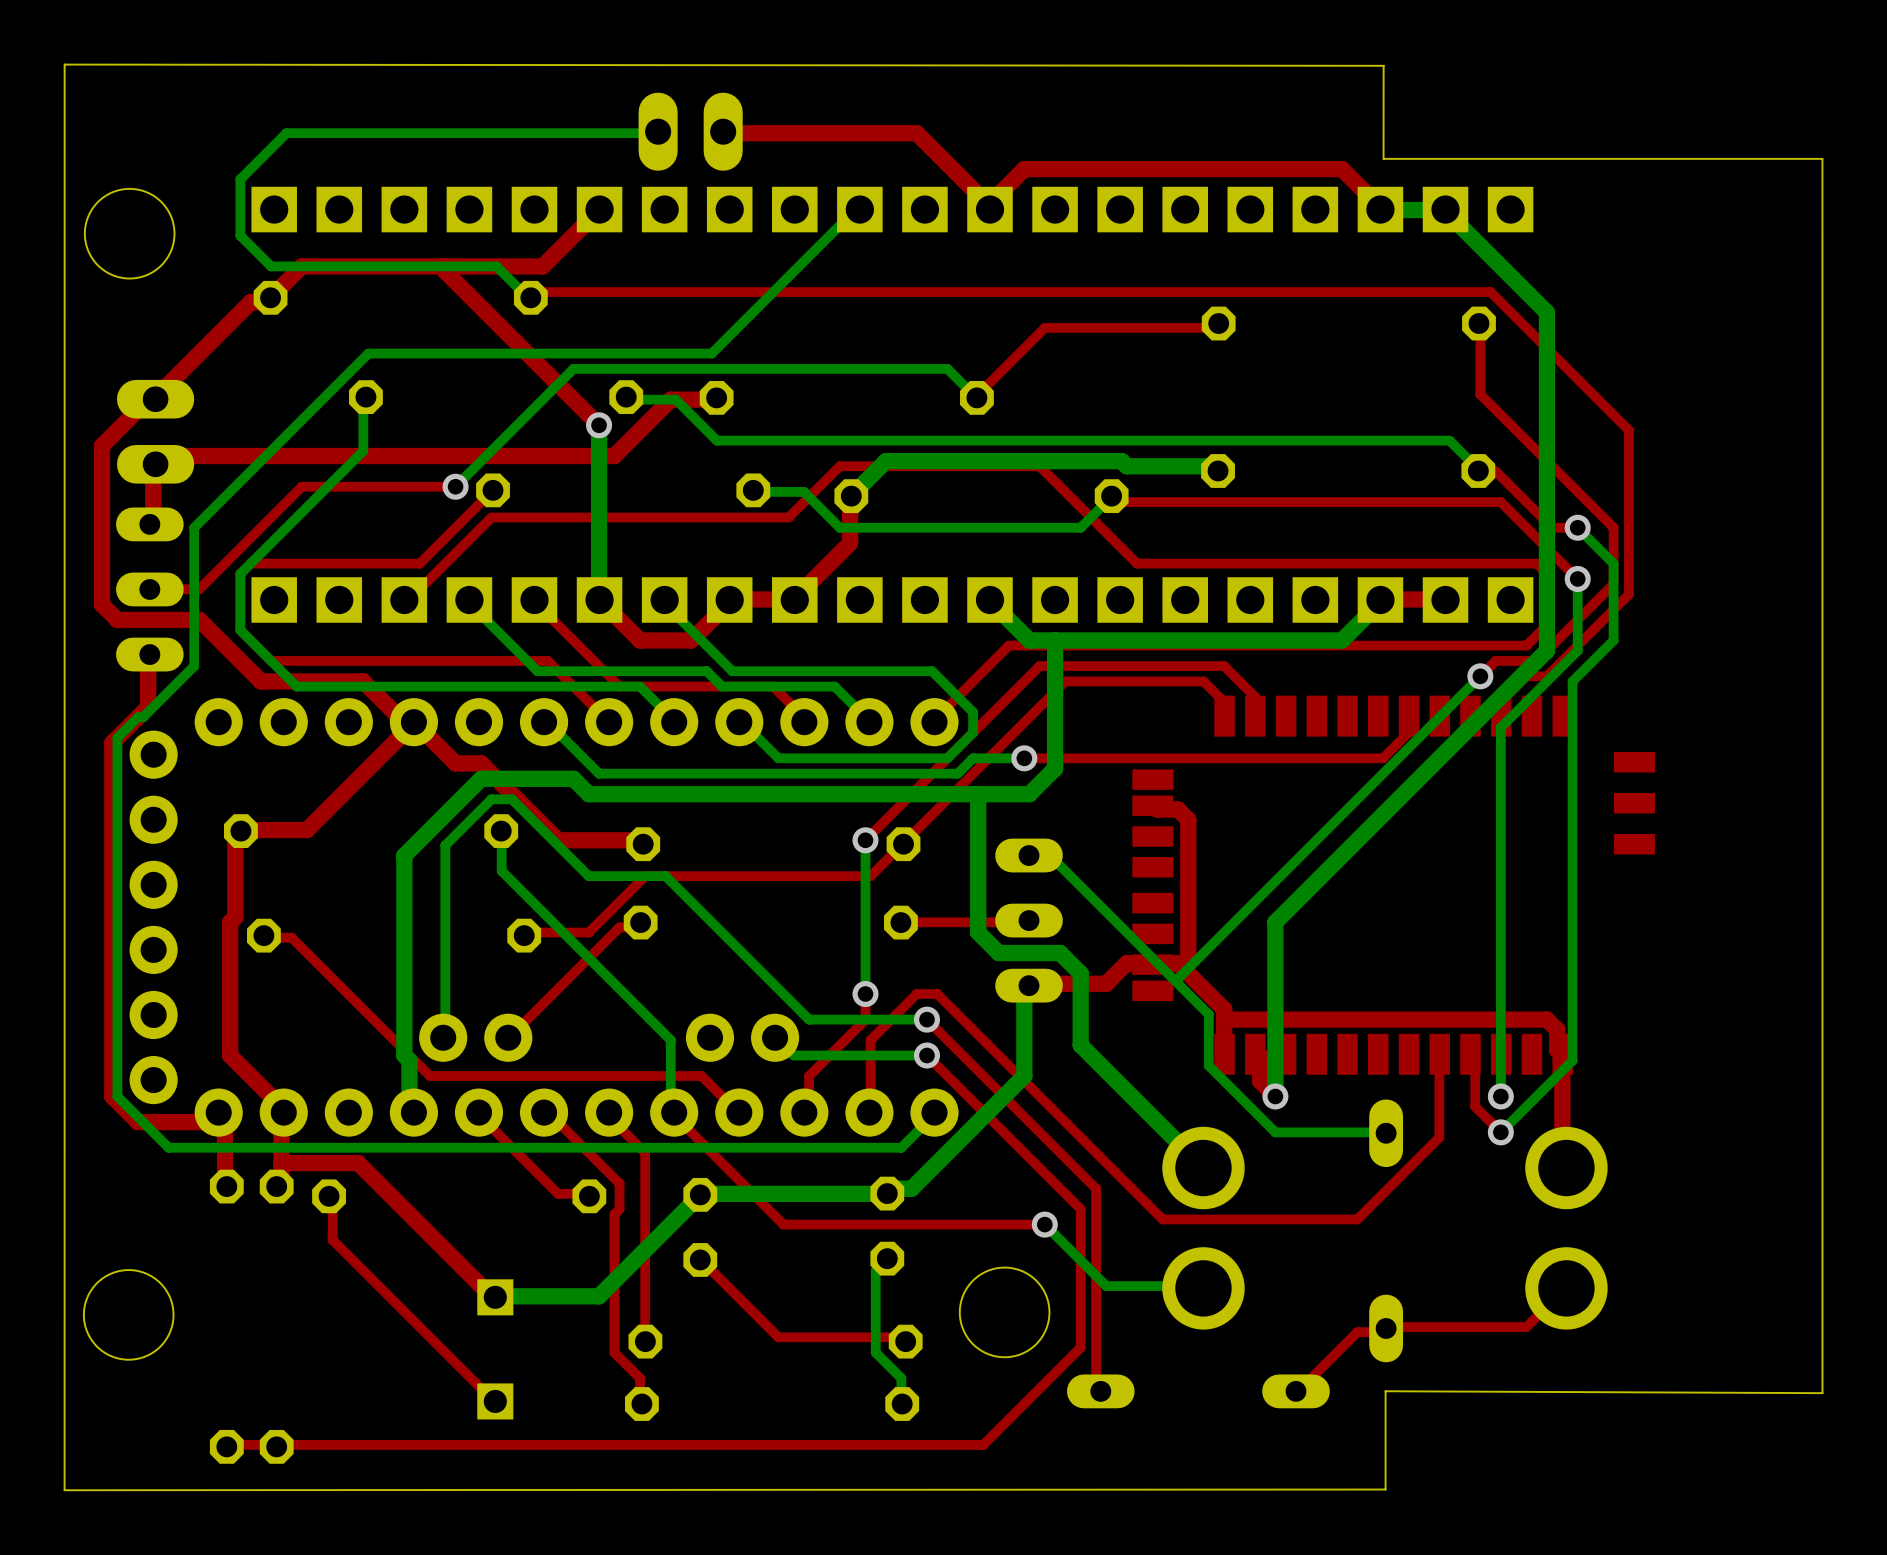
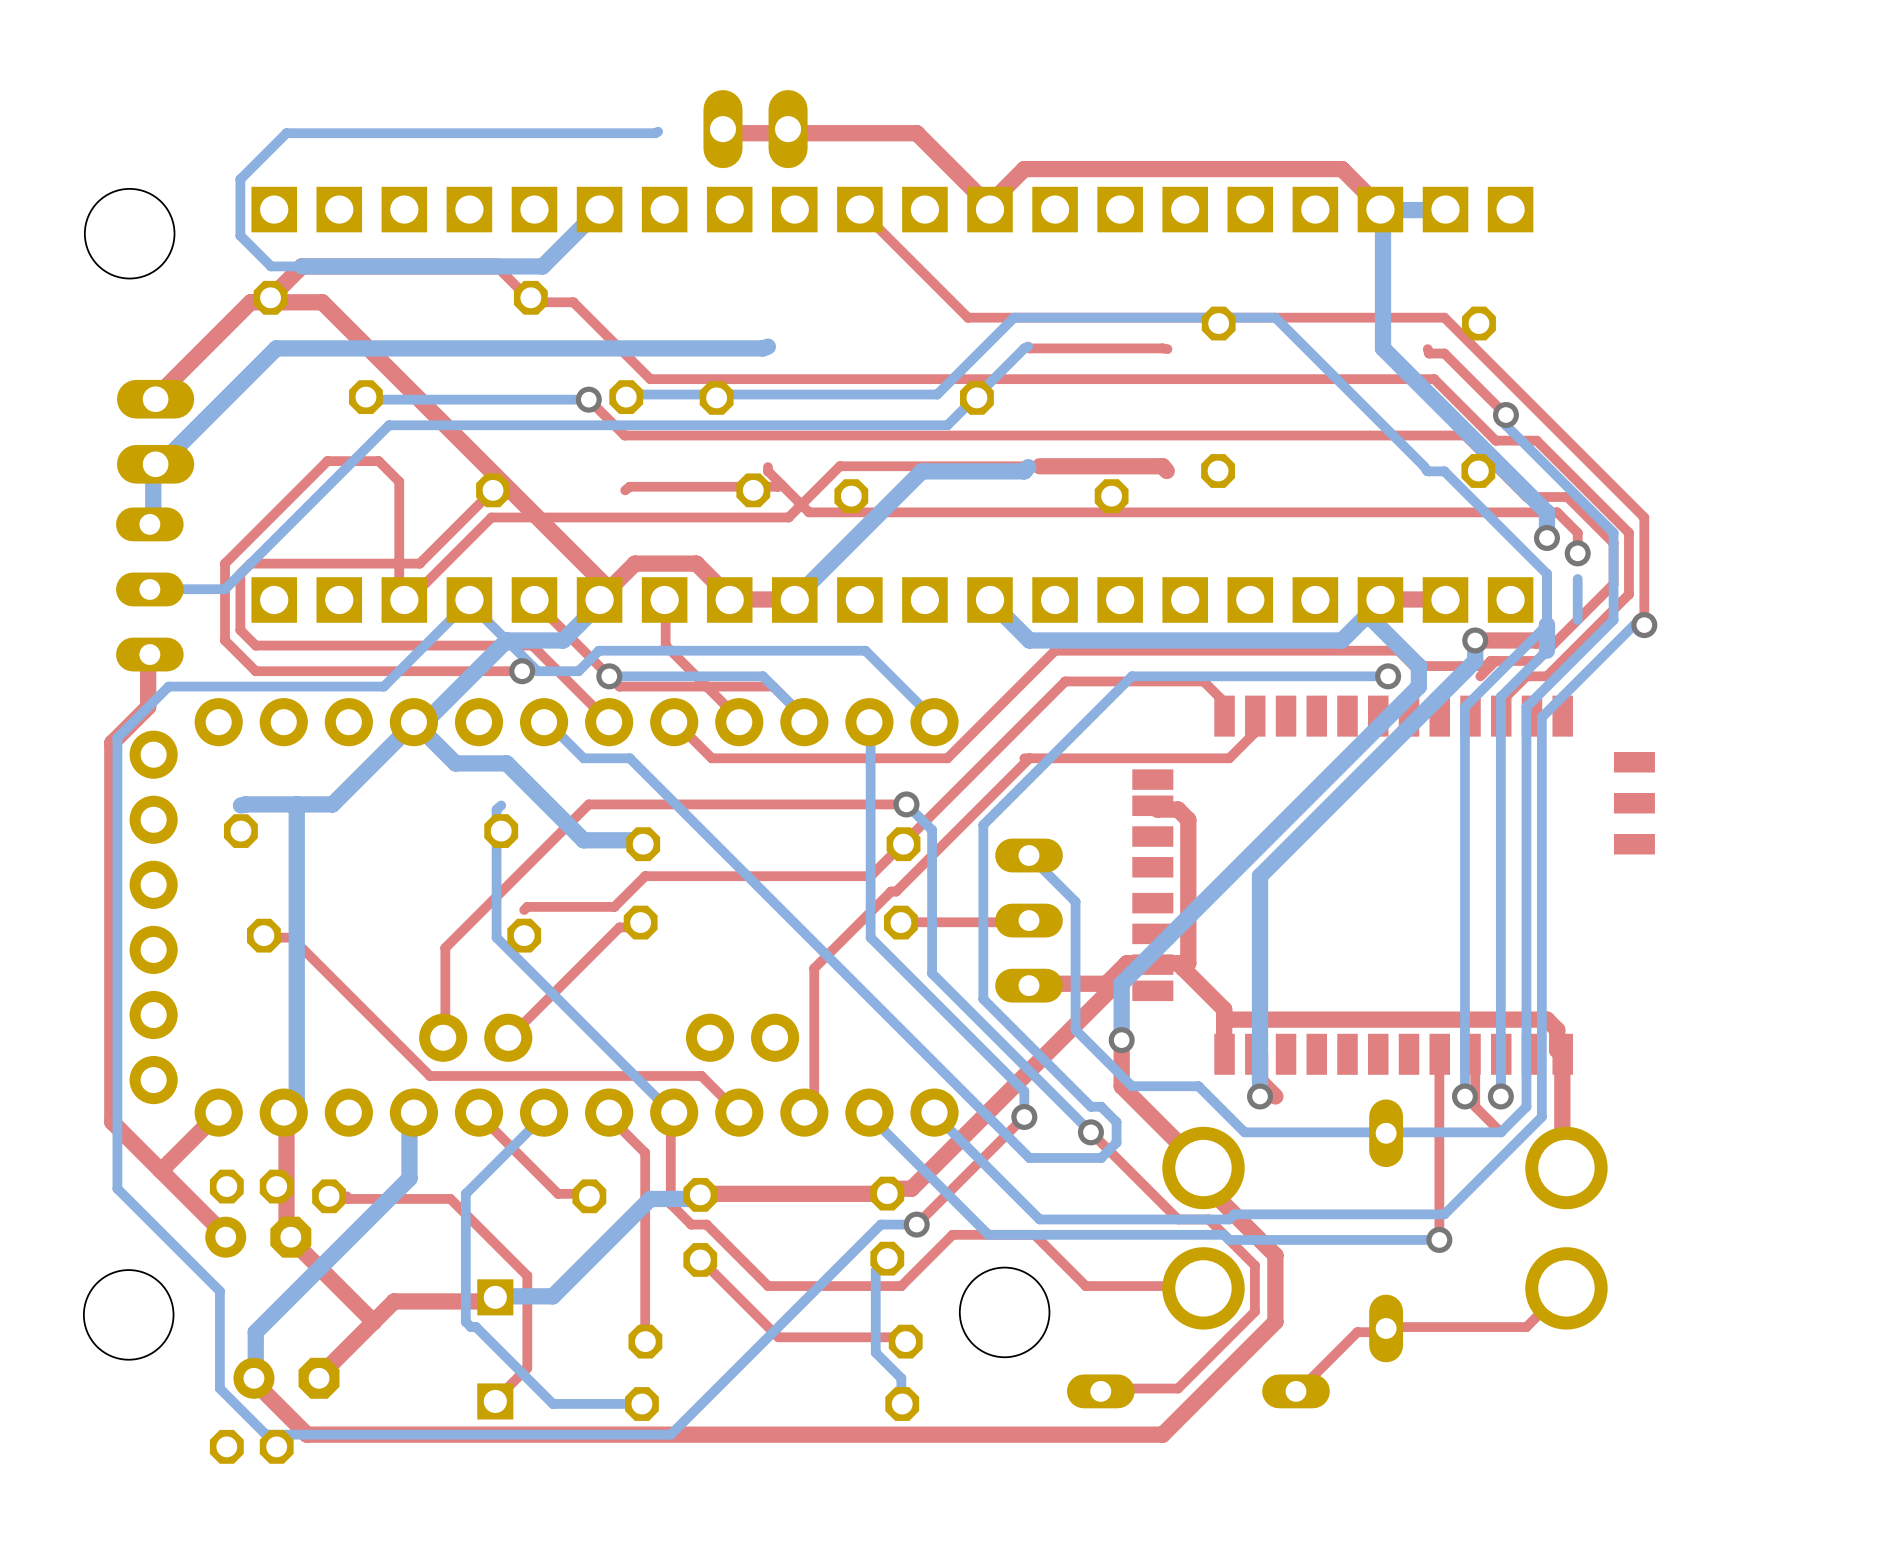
board edge: (64, 64) (64, 1490) (1385, 1489) (1385, 1391) (1822, 1393) (1822, 158) (1383, 158) (1383, 65) (64, 64) -> none
part position: (690, 131) -> (755, 129)
top track: (599, 209) (542, 266) (496, 266) -> none
top track: none -> (859, 209) (967, 317) (1444, 317) (1644, 517) (1644, 625)
bottom track: (859, 209) (855, 210) (711, 353) (368, 353) (194, 527) (194, 666) (143, 717) (137, 717) -> (296, 686) (168, 686) (137, 717)
bottom track: (1444, 210) (1546, 312) (1546, 512) -> (1383, 210) (1383, 348) (1546, 512)
top track: (445, 266) (445, 271) (599, 425) -> none
bottom track: (496, 266) (527, 297) (530, 297) -> (496, 266) (542, 266) (599, 209)
bottom track width: thin (496, 266) (301, 266) -> thick (496, 266) (301, 266)
top track: (530, 297) (537, 292) (1490, 292) (1628, 430) (1628, 532) -> (496, 266) (527, 297) (530, 297) (532, 302) (573, 302) (650, 379) (1434, 379) (1495, 440) (1536, 440) (1628, 532)
top track: (1218, 323) (1213, 327) (1044, 327) (976, 397) -> none
top track: (1478, 323) (1480, 394) (1613, 527) (1613, 543) -> (588, 399) (624, 435) (1464, 435) (1526, 497) (1567, 497) (1613, 543)
bottom track: none -> (767, 346) (763, 348) (276, 348) (158, 466) (155, 464) (153, 471) (153, 522) (149, 524)
top track: none -> (1028, 346) (1029, 348) (1167, 349)
bottom track: none -> (1028, 346) (947, 425) (388, 425) (363, 450)
top track: none -> (1427, 349) (1429, 353) (1444, 353) (1505, 415)
bottom track: (365, 397) (363, 399) (363, 450) -> (365, 397) (368, 399) (588, 399)
bottom track: (626, 397) (629, 399) (675, 399) (716, 440) (1449, 440) (1478, 470) -> (626, 397) (629, 394) (937, 394) (1014, 317) (1275, 317) (1427, 470) (1444, 471) (1546, 573)
top track: (716, 397) (711, 399) (670, 399) (614, 456) (163, 456) (155, 464) (153, 471) (153, 522) (149, 524) -> none
bottom track: (976, 397) (947, 368) (573, 368) (455, 486) -> none
top track: (155, 399) (148, 399) (102, 445) (102, 604) (117, 619) (199, 619) (260, 681) (363, 681) (404, 722) (413, 722) -> none
via: none -> (1505, 415)
bottom track: (599, 425) (599, 599) -> (413, 722) (424, 722) (506, 640) (563, 640) (599, 604) (599, 599)
via position: (599, 425) -> (588, 399)
top track: (1039, 466) (1137, 563) (1536, 563) (1546, 573) -> (1039, 466) (1162, 466) (1166, 470)
top track: none -> (767, 467) (768, 471) (809, 512) (1557, 512) (1577, 532) (1577, 553)
bottom track: none -> (1028, 467) (1024, 471) (921, 471) (794, 599)
bottom track: (1218, 470) (1213, 466) (1126, 466) (1121, 461) (885, 461) (851, 496) -> none
top track: (1478, 470) (1495, 471) (1552, 527) (1577, 527) -> none
top track: none -> (780, 484) (778, 486) (629, 486) (625, 490)
top track: (455, 486) (301, 486) -> (404, 599) (399, 599) (399, 481) (378, 461) (327, 461) (301, 486)
via: (455, 486) -> none
bottom track: (753, 490) (804, 491) (839, 527) (1080, 527) (1111, 496) -> none
top track: (851, 496) (850, 543) (793, 599) -> none
top track: (1111, 496) (1116, 497) (1121, 502) (1500, 502) (1577, 578) -> none
bottom track: (1577, 527) (1613, 563) -> (1505, 415) (1505, 425) (1613, 532) (1613, 563)
via: (1577, 527) -> none
bottom track: (1546, 537) (1546, 573) -> none
via: none -> (1546, 537)
via: none -> (1577, 553)
top track: (225, 563) (199, 589) (149, 589) -> (225, 563) (225, 640) (255, 671) (522, 671)
bottom track: (240, 573) (240, 630) (296, 686) -> (240, 573) (225, 589) (149, 589)
bottom track width: thick (1546, 573) (1546, 625) -> thin (1546, 573) (1546, 625)
via: (1577, 578) -> none
top track: none -> (664, 599) (665, 645) (737, 717) (739, 722)
bottom track: (664, 599) (665, 604) (732, 671) (932, 671) (973, 712) (973, 732) (947, 758) (778, 758) (742, 722) (739, 722) -> none
top track: (729, 599) (691, 640) (640, 640) (599, 599) -> (729, 599) (727, 594) (696, 563) (634, 563) (599, 599) (604, 584) (322, 302) (276, 302) (270, 297)
bottom track: none -> (1380, 599) (1372, 619) (1418, 666) (1418, 686) (1121, 983) (1121, 1040)
bottom track: (1577, 619) (1577, 650) (1500, 727) -> (1500, 696) (1500, 727)
bottom track: (1613, 619) (1613, 640) (1572, 681) (1572, 1060) (1526, 1106) -> (1613, 619) (1526, 707) (1526, 1106)
top track: (1546, 625) (1526, 645) (1008, 645) (934, 722) -> (1546, 625) (1546, 630) (1536, 640) (1475, 640)
bottom track: none -> (1546, 625) (1464, 707) (1464, 1096)
bottom track: none -> (1644, 625) (1634, 625) (1541, 717) (1541, 1116) (1444, 1214) (1234, 1214) (1229, 1219) (1039, 1219) (934, 1112)
via: none -> (1644, 625)
bottom track: (1055, 640) (1055, 768) (1029, 794) (588, 794) (573, 778) (481, 778) (404, 855) (404, 1055) (409, 1060) (409, 1111) (413, 1112) -> (253, 1378) (255, 1373) (255, 1332) (409, 1178) (409, 1116) (413, 1112)
bottom track: none -> (1475, 640) (1475, 660) (1260, 876) (1260, 1096)
top track: (255, 645) (271, 660) (547, 660) -> (255, 645) (532, 645) (547, 660)
bottom track width: thick (1546, 650) (1500, 696) -> thin (1546, 650) (1500, 696)
top track: (1039, 666) (1224, 666) (1254, 696) (1255, 716) -> (1039, 666) (1055, 650) (1398, 650) (1413, 666) (1485, 666) (1490, 660) (1495, 660)
via: none -> (522, 671)
bottom track: (578, 671) (706, 671) (722, 686) (834, 686) (869, 722) -> (578, 671) (599, 650) (865, 650) (932, 717) (934, 722)
bottom track: none -> (609, 676) (763, 676) (804, 717) (804, 722)
via: none -> (609, 676)
via: none -> (1388, 676)
bottom track: (1480, 676) (1175, 981) -> none
via position: (1480, 676) -> (1475, 640)
bottom track: (383, 686) (640, 686) (674, 722) -> (383, 686) (469, 599)
bottom track: (1500, 696) (1275, 922) (1275, 1096) -> none
top track: (1409, 716) (1408, 732) (1383, 758) (1229, 758) -> (1255, 716) (1254, 732) (1229, 758)
top track: (413, 722) (455, 763) (481, 763) (558, 840) (640, 840) (643, 844) -> none
top track: (413, 722) (307, 830) (245, 830) (235, 835) (235, 917) (230, 922) (230, 1055) (281, 1106) (283, 1112) (281, 1116) (281, 1183) (276, 1186) -> none
bottom track: none -> (413, 722) (455, 763) (506, 763) (583, 840) (640, 840) (643, 844)
bottom track: none -> (413, 722) (332, 804) (240, 805)
bottom track: none -> (869, 722) (870, 937) (1024, 1091) (1024, 1116)
top track: (947, 758) (865, 840) -> (947, 758) (711, 758) (674, 722)
bottom track: (1024, 758) (973, 758) (957, 773) (599, 773) (583, 758) -> (1388, 676) (1131, 676) (983, 824) (983, 999) (1090, 1106) (1101, 1106) (1116, 1122) (1116, 1142) (1101, 1157) (1029, 1157) (629, 758) (583, 758)
via: (1024, 758) -> none
bottom track: (978, 794) (978, 932) (998, 953) (1060, 953) (1080, 973) (1080, 1045) (1203, 1168) -> none
bottom track: none -> (296, 804) (296, 1101) (283, 1112)
top track: none -> (906, 804) (588, 804) (445, 947) (445, 1035) (443, 1037)
bottom track: none -> (906, 804) (932, 830) (932, 973) (1090, 1132)
bottom track: (501, 831) (501, 871) (670, 1040) (670, 1111) -> (501, 805) (496, 809) (496, 937) (670, 1111)
bottom track: (865, 840) (865, 994) -> none
via position: (865, 840) -> (906, 804)
bottom track: (1029, 855) (1049, 855) (1208, 1014) (1208, 1065) (1275, 1132) -> (1029, 855) (1075, 901) (1075, 1029) (1131, 1086) (1198, 1086) (1244, 1132) (1275, 1132)
top track: (614, 906) (588, 932) (527, 932) (524, 935) -> (614, 906) (527, 906) (524, 910)
top track: none -> (1106, 983) (1111, 988) (911, 1188) (891, 1188) (885, 1193) (700, 1194)
bottom track: (1029, 985) (1024, 988) (1024, 1075) (911, 1188) (891, 1188) (885, 1193) (700, 1194) -> none
top track: (865, 994) (865, 1019) (809, 1075) (809, 1111) -> (1029, 758) (896, 891) (891, 891) (814, 968) (814, 1106) (809, 1111)
via: (865, 994) -> none
top track: (926, 1019) (1096, 1188) (1096, 1388) (1100, 1391) -> (1208, 1219) (1254, 1265) (1254, 1311) (1178, 1388) (1101, 1388) (1100, 1391)
bottom track: (926, 1019) (809, 1019) (665, 876) (588, 876) (511, 799) (491, 799) (445, 845) (445, 1035) (443, 1037) -> none
via: (926, 1019) -> none
bottom track: (775, 1037) (793, 1055) (926, 1055) -> none
top track: none -> (1121, 1040) (1121, 1086) (1203, 1168)
via: none -> (1121, 1040)
top track: (926, 1055) (1080, 1209) (1080, 1347) (983, 1444) (281, 1444) (276, 1446) (276, 1444) (230, 1444) (226, 1446) -> none
via: (926, 1055) -> none
top track: (112, 1096) (137, 1122) (214, 1122) (218, 1112) (225, 1122) (225, 1183) (226, 1186) -> (112, 1096) (112, 1122) (225, 1237)
bottom track: (117, 1096) (168, 1147) (901, 1147) (934, 1112) -> (117, 1096) (117, 1188) (219, 1291) (219, 1388) (266, 1434) (670, 1434) (880, 1224) (916, 1224)
via position: (1275, 1096) -> (1260, 1096)
top track: none -> (218, 1112) (160, 1170)
top track: none -> (283, 1112) (286, 1116) (286, 1234) (373, 1321)
top track: (544, 1112) (547, 1111) (619, 1183) (619, 1209) (614, 1214) (614, 1352) (640, 1378) (640, 1403) (641, 1404) -> none
bottom track: none -> (544, 1112) (542, 1116) (465, 1193) (465, 1321) (470, 1327) (476, 1327) (552, 1403) (641, 1404)
top track: (674, 1112) (675, 1116) (783, 1224) (1044, 1224) -> (674, 1112) (670, 1116) (670, 1204) (691, 1224) (706, 1224) (768, 1286) (901, 1286) (952, 1234) (1034, 1234) (1085, 1286) (1198, 1286) (1203, 1288)
top track: (869, 1112) (870, 1040) (916, 994) (937, 994) (1162, 1219) (1178, 1219) -> (1090, 1132) (1178, 1219)
bottom track: none -> (869, 1112) (870, 1116) (988, 1234) (1224, 1234) (1229, 1239) (1439, 1239)
top track: none -> (1024, 1116) (916, 1224)
via: none -> (1024, 1116)
via: none -> (1090, 1132)
bottom track: none -> (1500, 1132) (1386, 1133)
via position: (1500, 1132) -> (1464, 1096)
top track: (1439, 1137) (1357, 1219) (1208, 1219) -> (1439, 1137) (1439, 1239)
top track: (281, 1163) (358, 1163) (491, 1296) (495, 1297) -> (319, 1378) (394, 1301) (491, 1301) (495, 1297)
top track: none -> (1203, 1168) (1203, 1183) (1275, 1255) (1275, 1321) (1162, 1434) (307, 1434) (255, 1383) (253, 1378)
top track: (329, 1196) (332, 1198) (332, 1239) (495, 1401) -> (346, 1196) (347, 1198) (450, 1198) (527, 1275) (527, 1368) (495, 1401)
bottom track: (696, 1198) (599, 1296) (552, 1296) -> (696, 1198) (650, 1198) (552, 1296)
via: none -> (916, 1224)
bottom track: (1044, 1224) (1106, 1286) (1198, 1286) (1203, 1288) -> none
via: (1044, 1224) -> none
part: none -> (258, 1237)
via: none -> (1439, 1239)
part: none -> (286, 1378)

